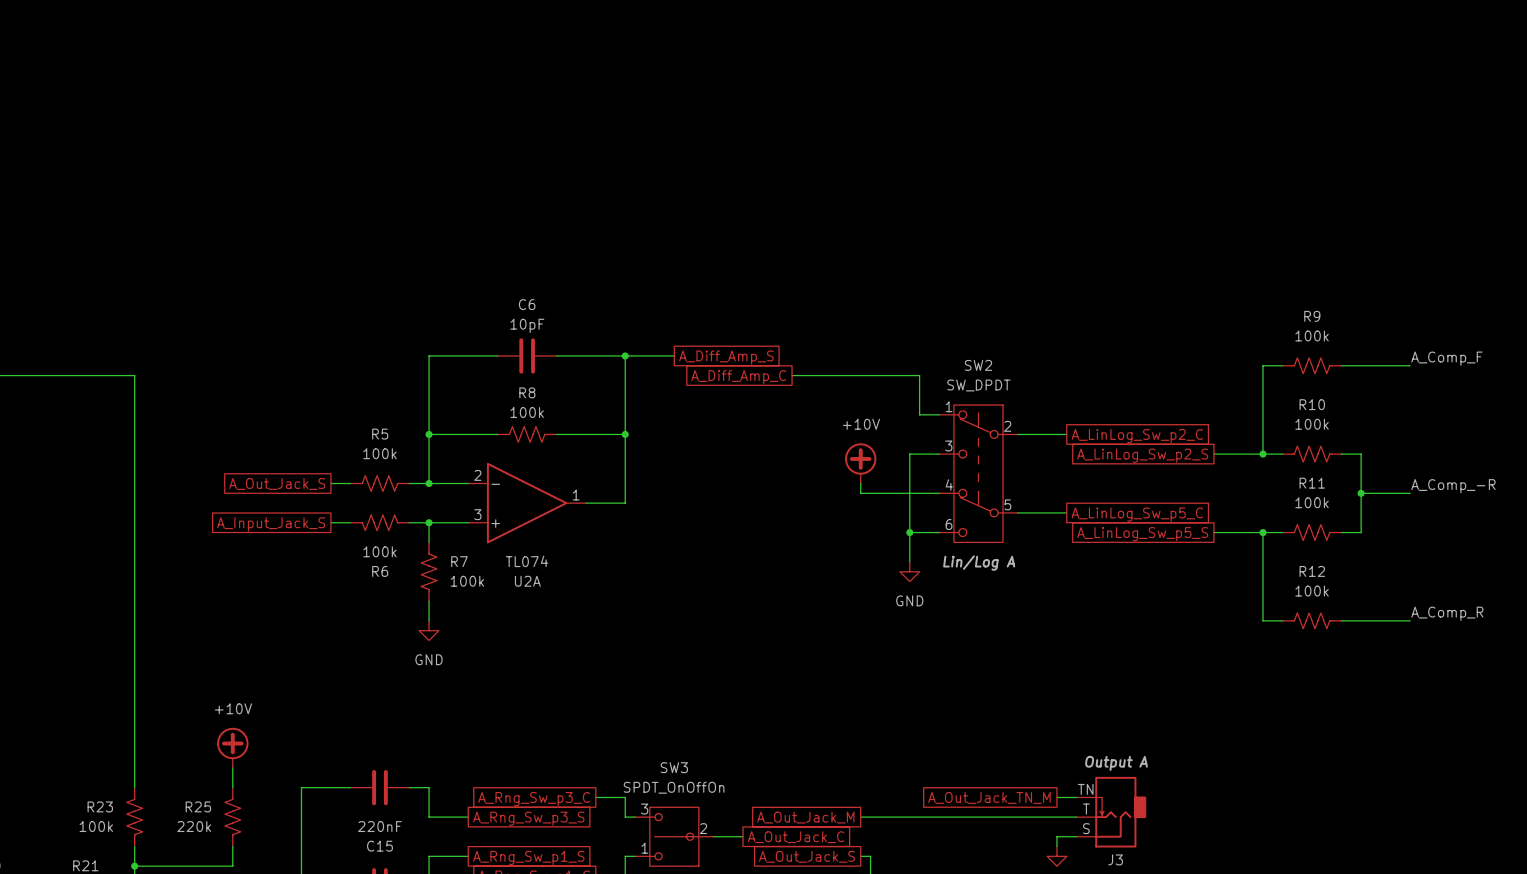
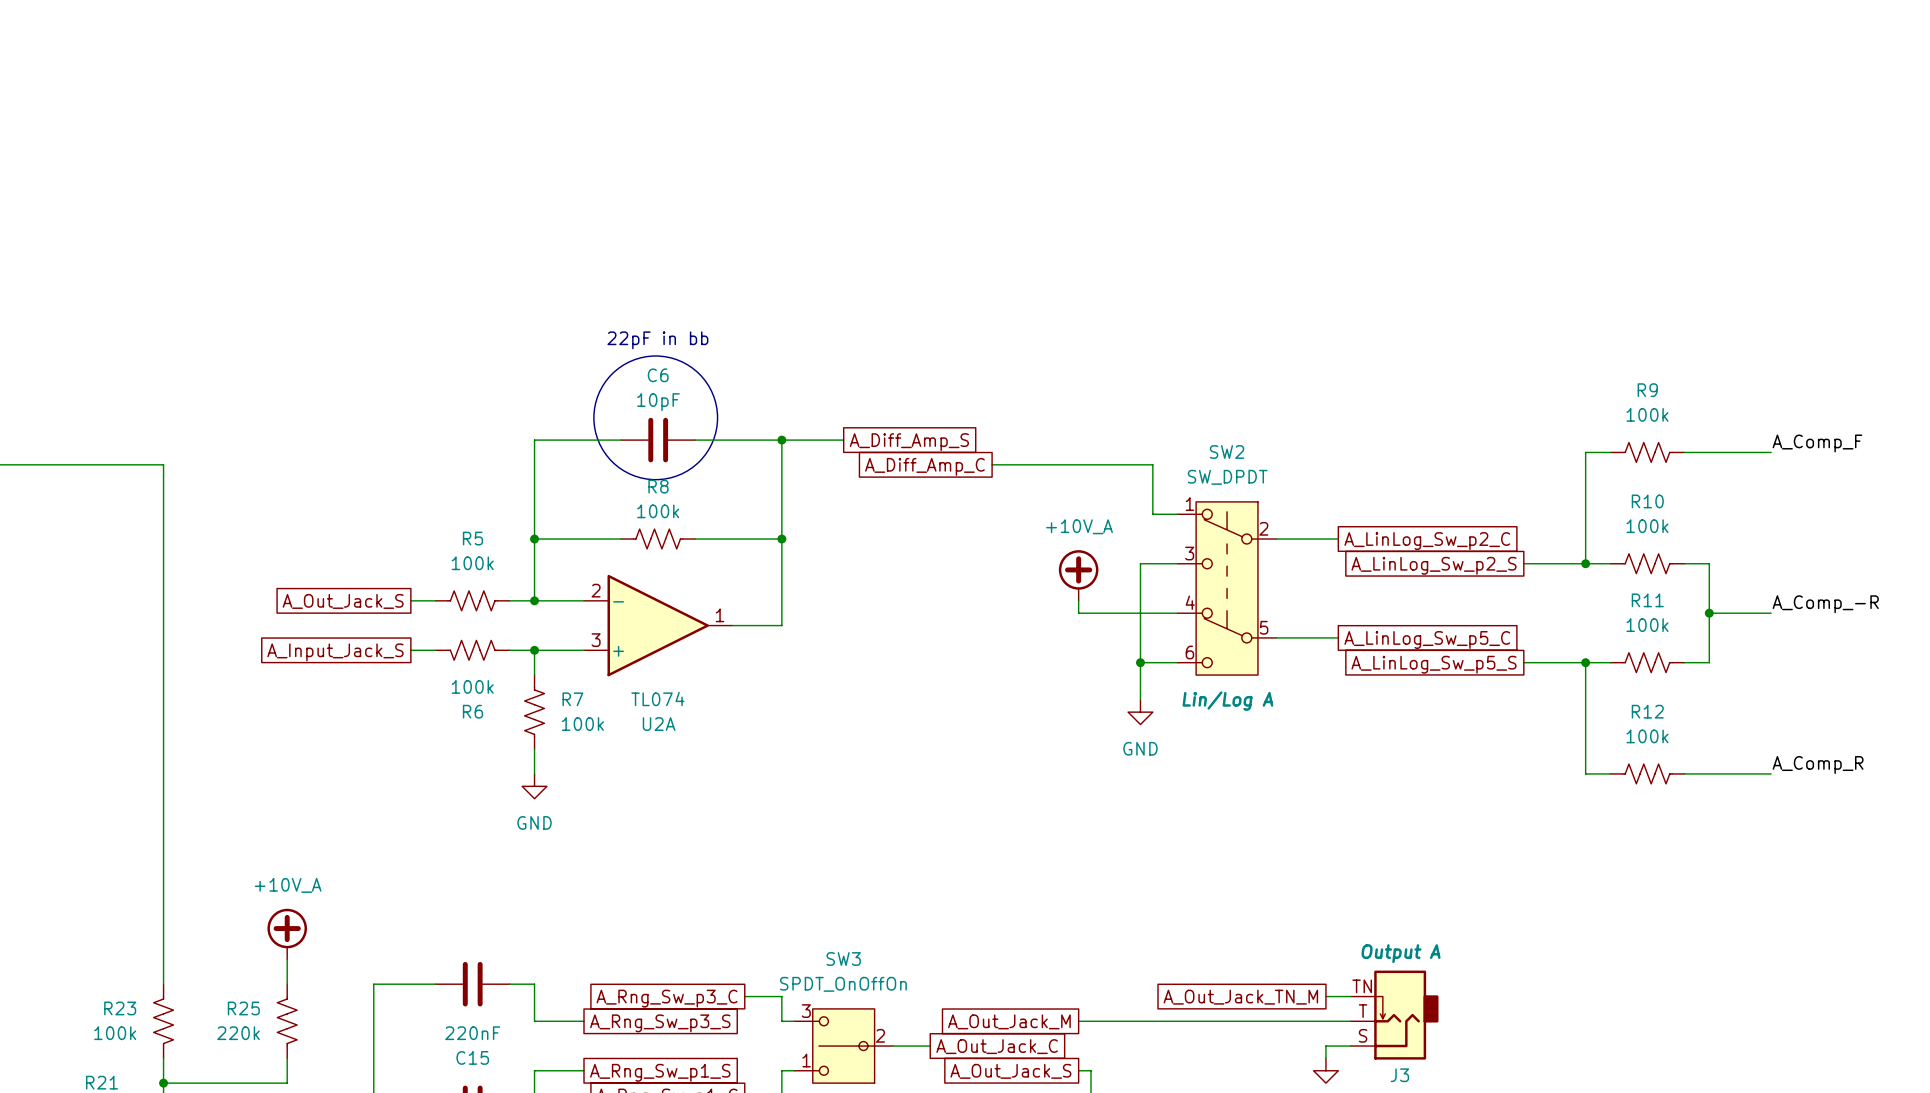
text: none -> 22pF in bb (657, 340)
drawing: none -> [593, 356, 718, 480]
power symbol: +10V (860, 463) -> +10V_A (1078, 575)
power symbol: +10V (232, 747) -> +10V_A (287, 934)

